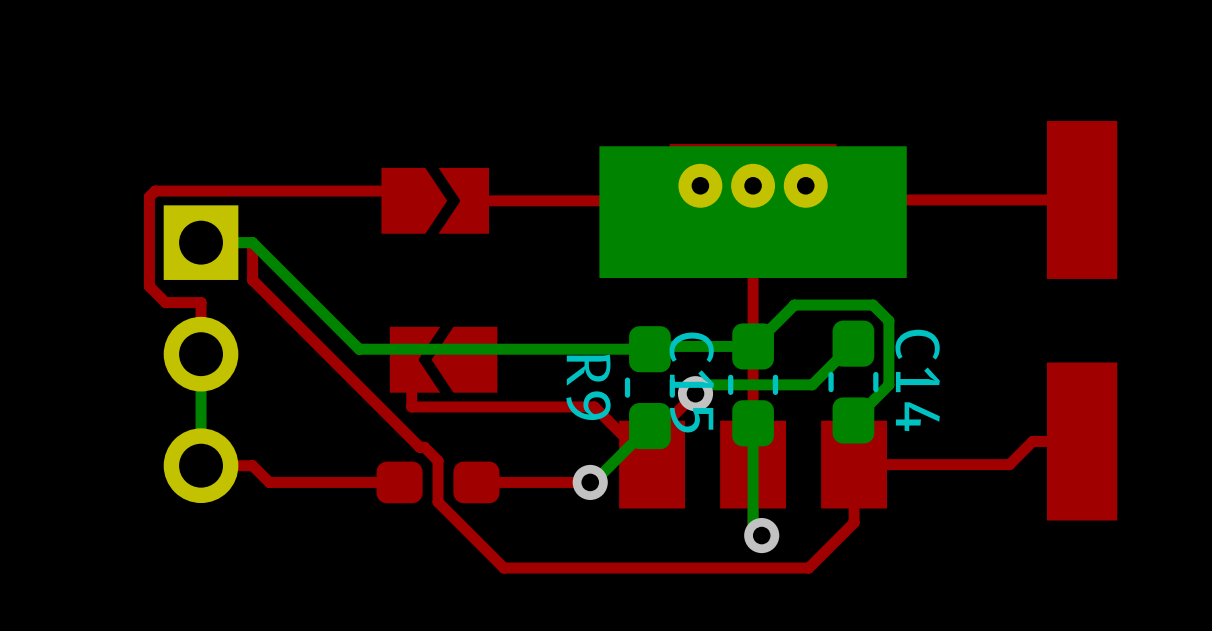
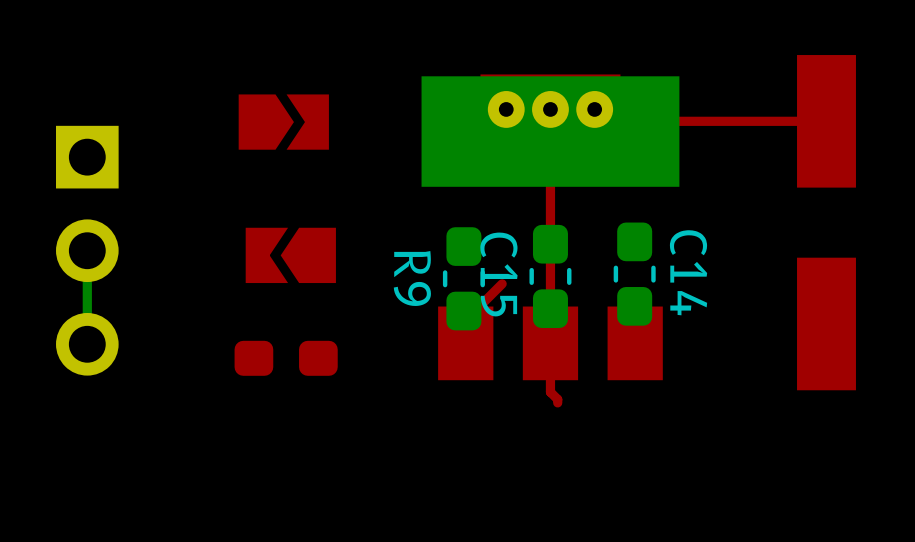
top track: (403, 200) (393, 191) (155, 191) (149, 196) (149, 286) (165, 302) (201, 302) (201, 354) -> none
top track: (685, 200) (467, 200) -> none
bottom track: (201, 242) (252, 242) (359, 349) (649, 349) (652, 346) (753, 346) (794, 305) (873, 305) (888, 320) (888, 385) (853, 420) -> none
top track: (201, 242) (252, 242) (252, 280) (419, 447) (424, 447) (438, 460) (438, 502) (503, 568) (808, 568) (854, 522) (854, 464) (1009, 464) (1032, 441) (1082, 441) -> none
bottom track: (853, 343) (812, 384) (704, 384) (695, 393) -> none
top track: (411, 359) (411, 406) (594, 406) (652, 464) -> none
via: (695, 393) -> none
bottom track: (753, 423) (753, 526) (761, 535) -> none
bottom track: (649, 426) (593, 482) (590, 482) -> none
top track: (201, 465) (252, 465) (269, 482) (399, 482) -> none
top track: (590, 482) (476, 482) -> none
via: (590, 482) -> none
via: (761, 535) -> none

